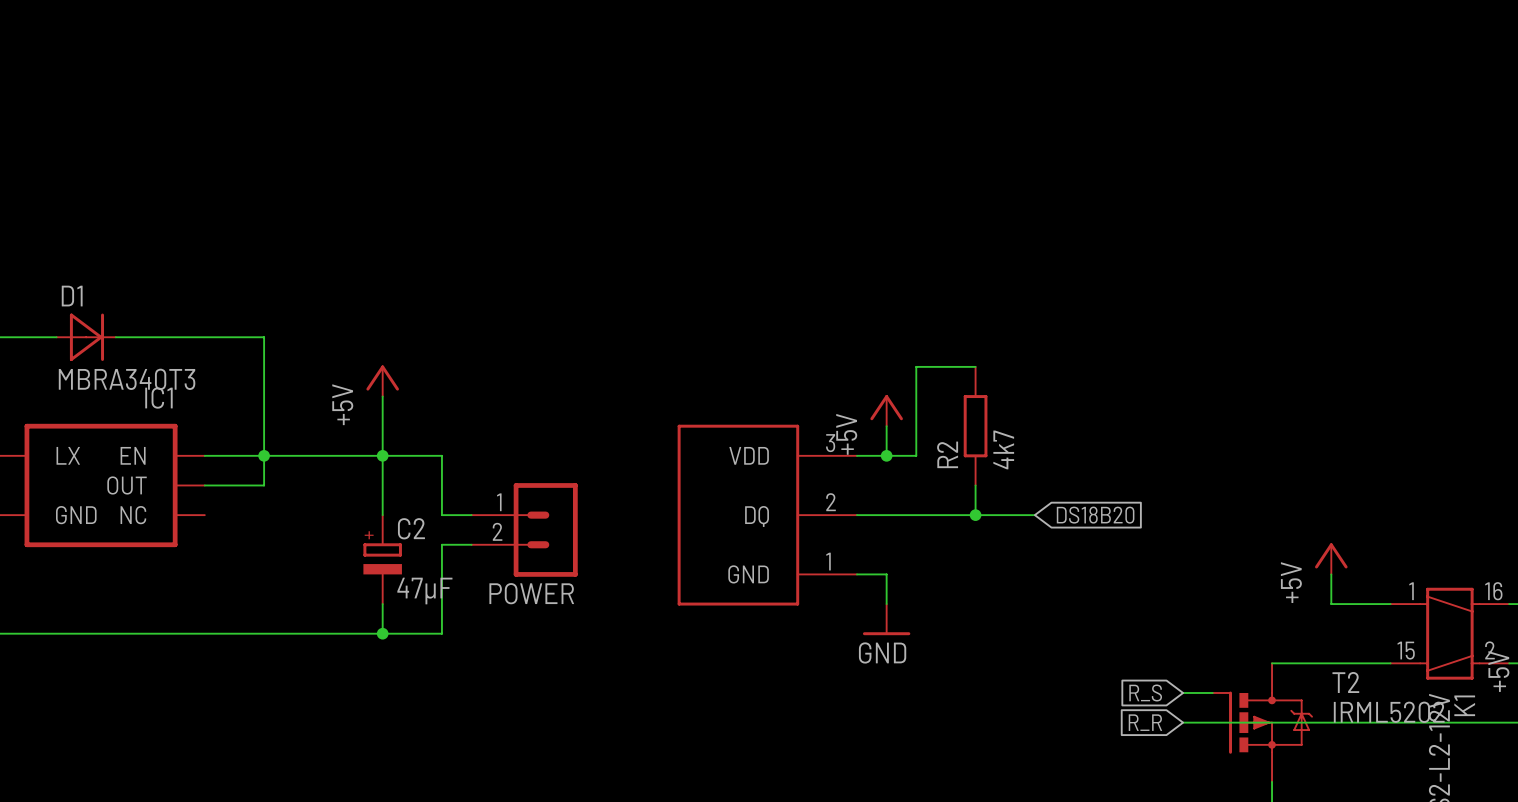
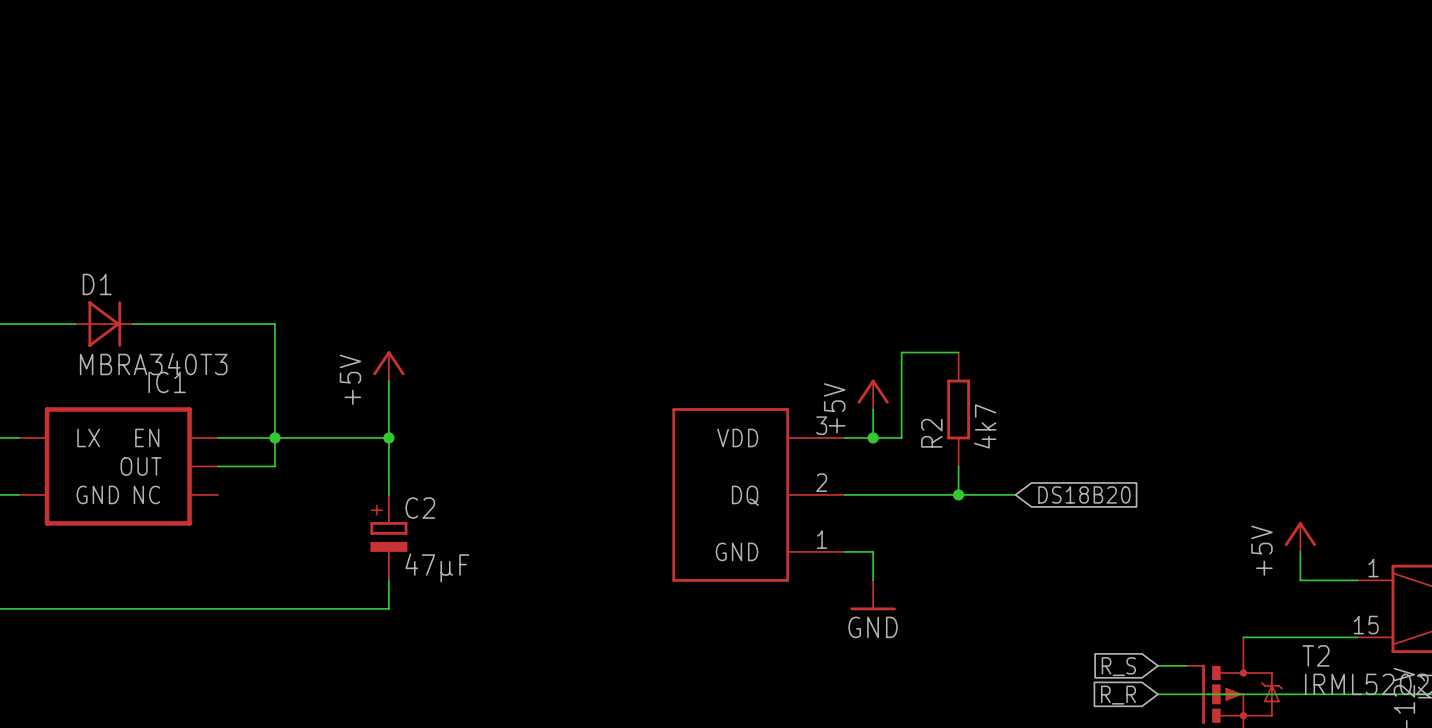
wire: (382, 455) (441, 455) (441, 515) (471, 515) -> none
POWER: (524, 529) -> none
wire: (471, 544) (441, 544) (441, 633) (382, 633) -> none
junction: (382, 633) -> none

